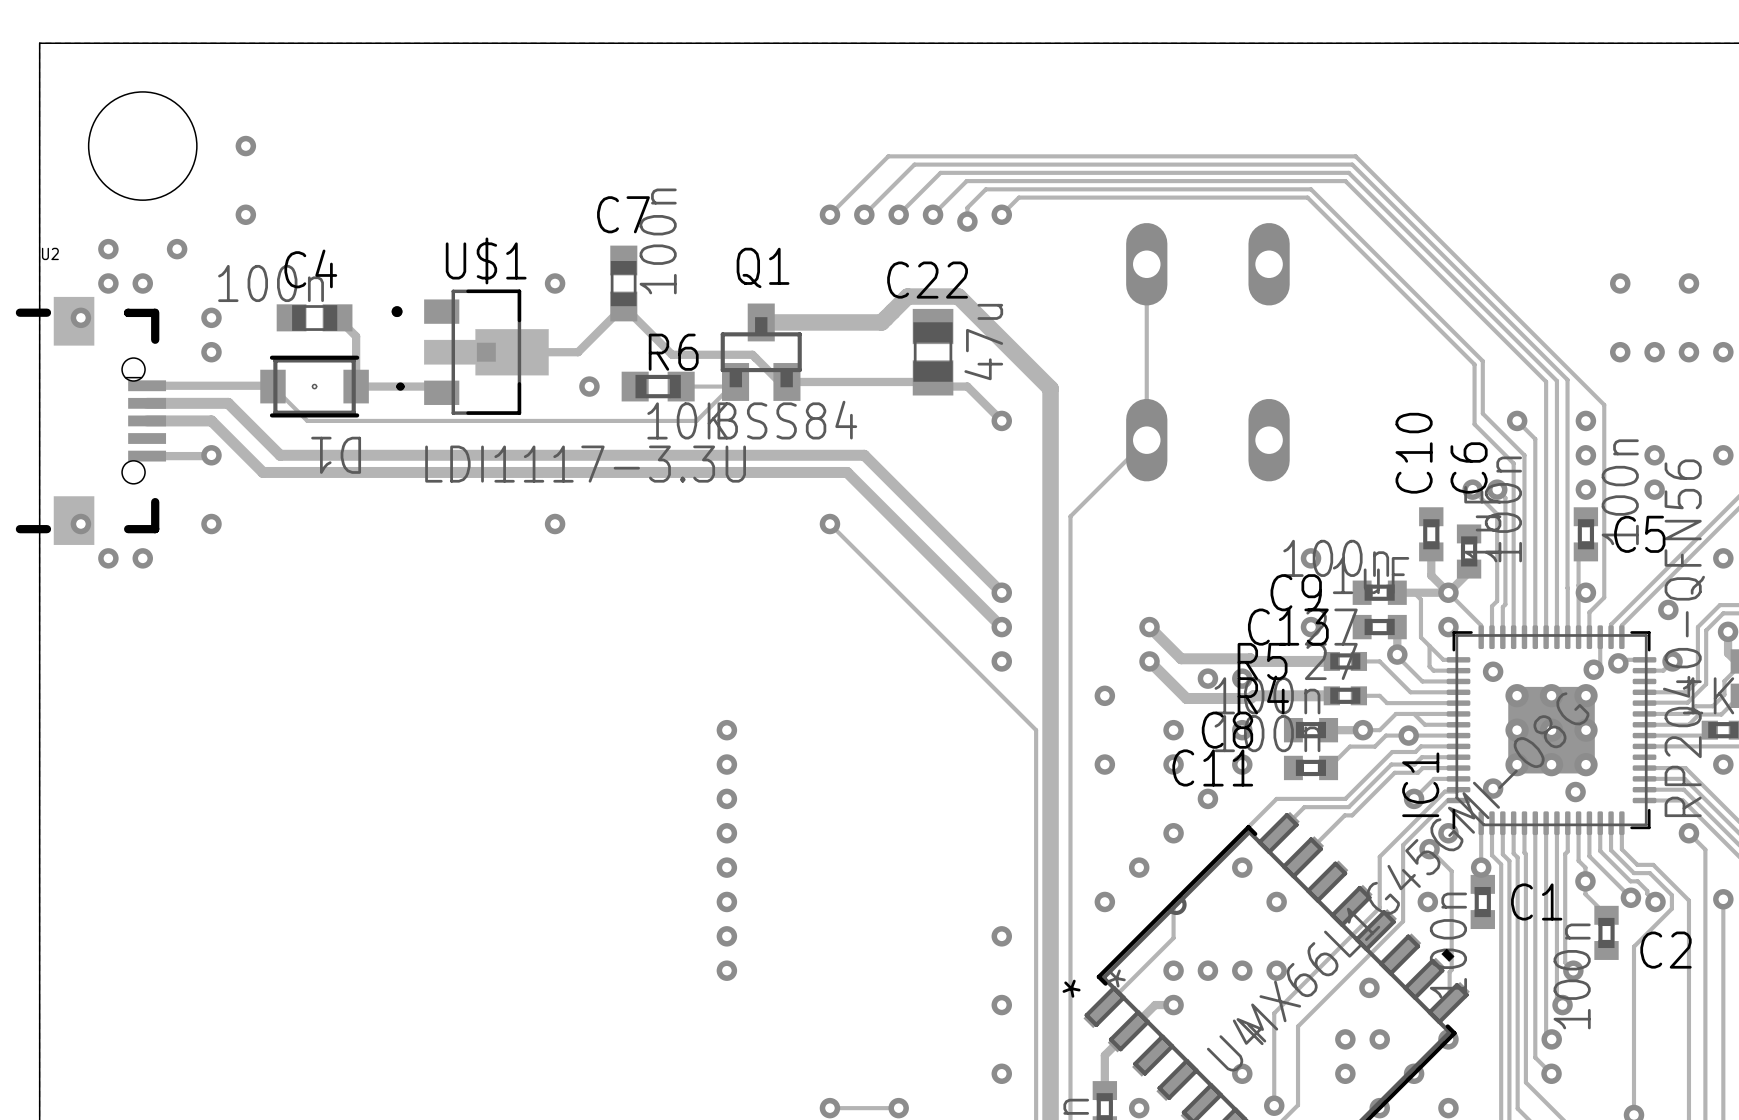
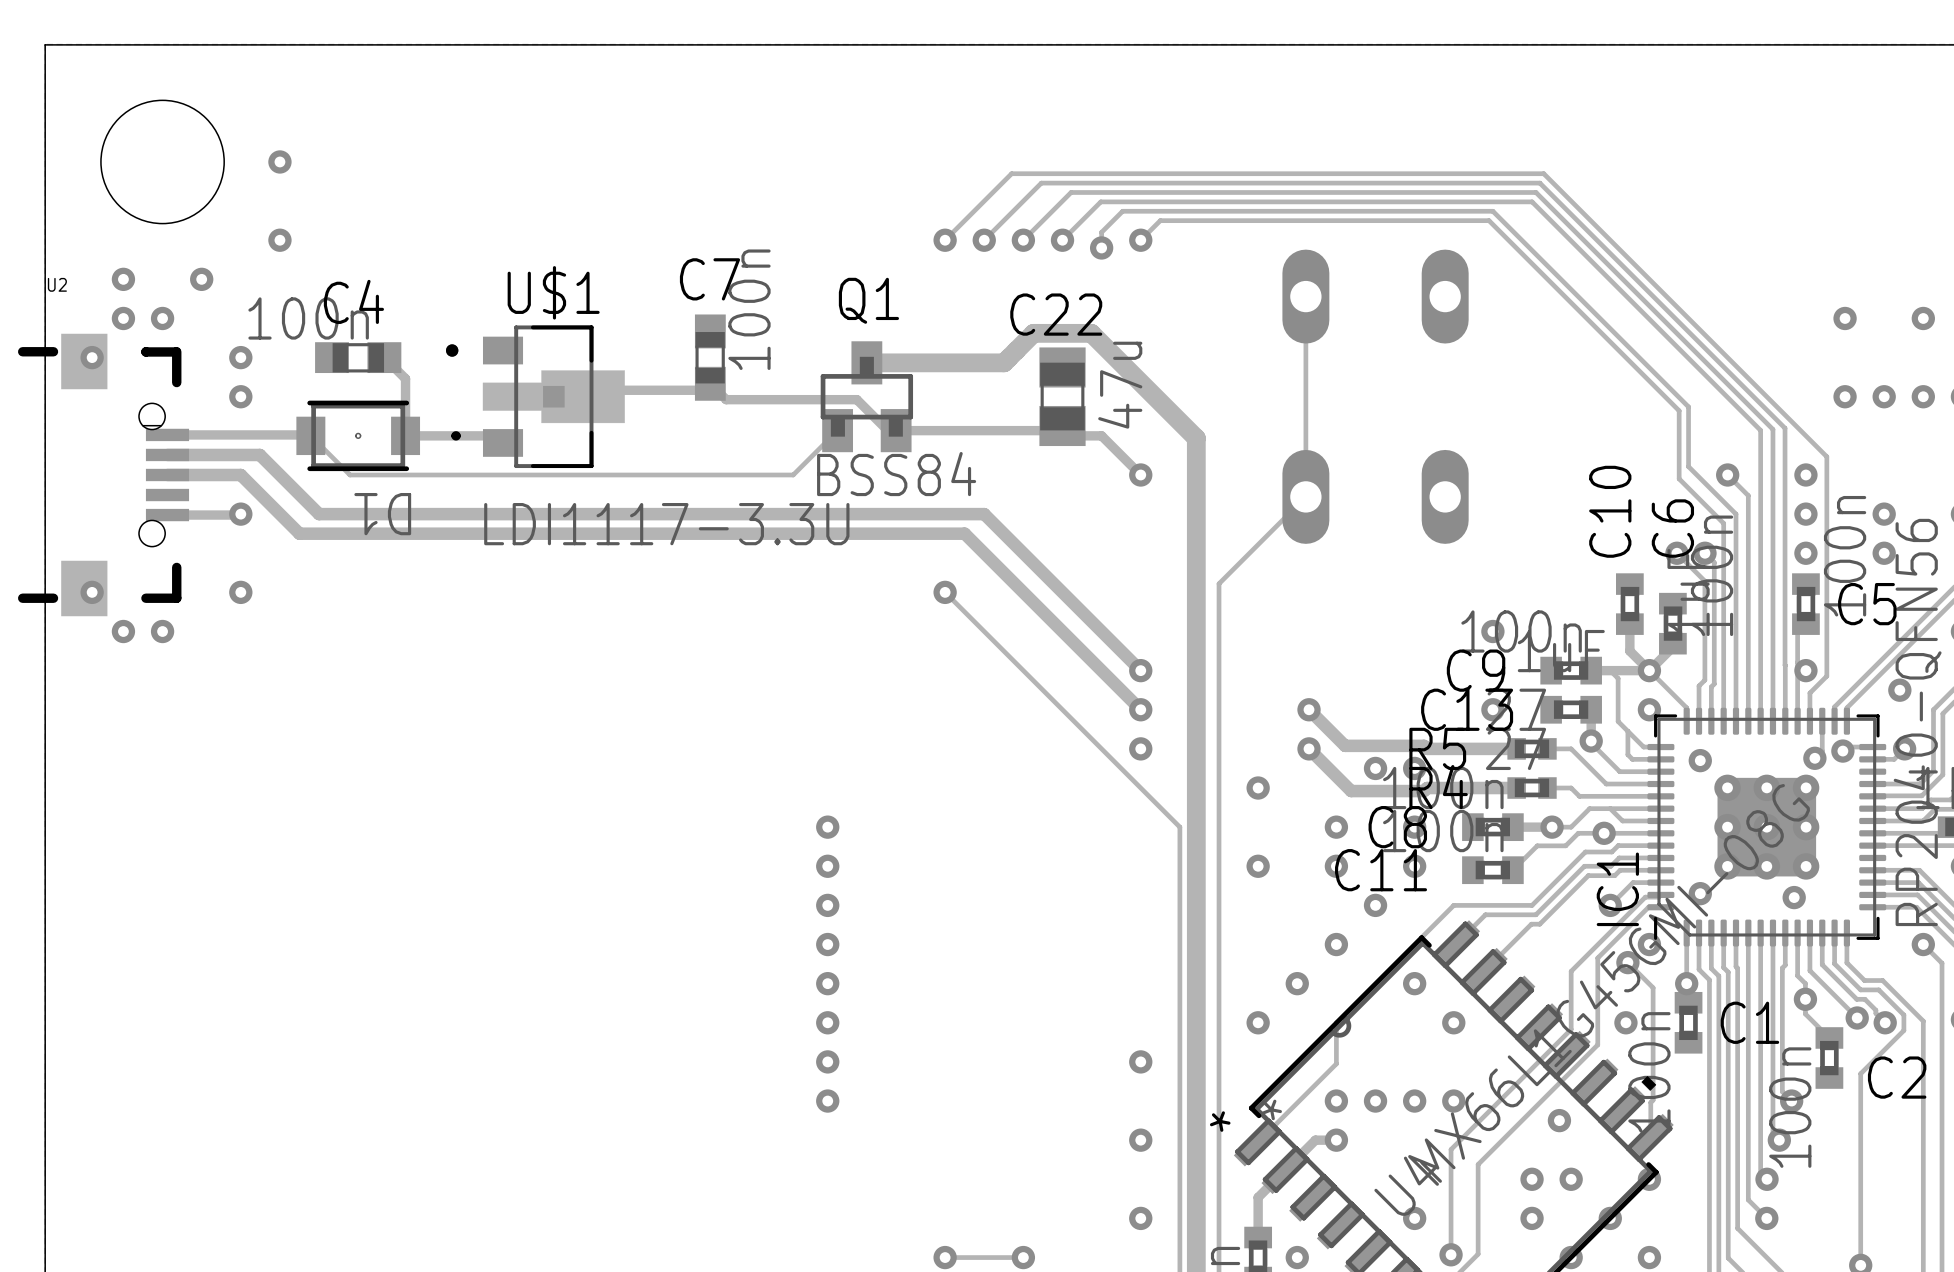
via: (555, 283) -> none
C7 position: (623, 283) -> (710, 357)
track: none -> (560, 390) (716, 390)
track: (486, 352) (578, 352) (623, 306) (672, 354) -> (710, 383) (726, 399) (765, 399)
via: (589, 386) -> none
R6: 10K (658, 386) -> none
track: (681, 386) (726, 386) (728, 388) -> none
via: (555, 524) -> none

